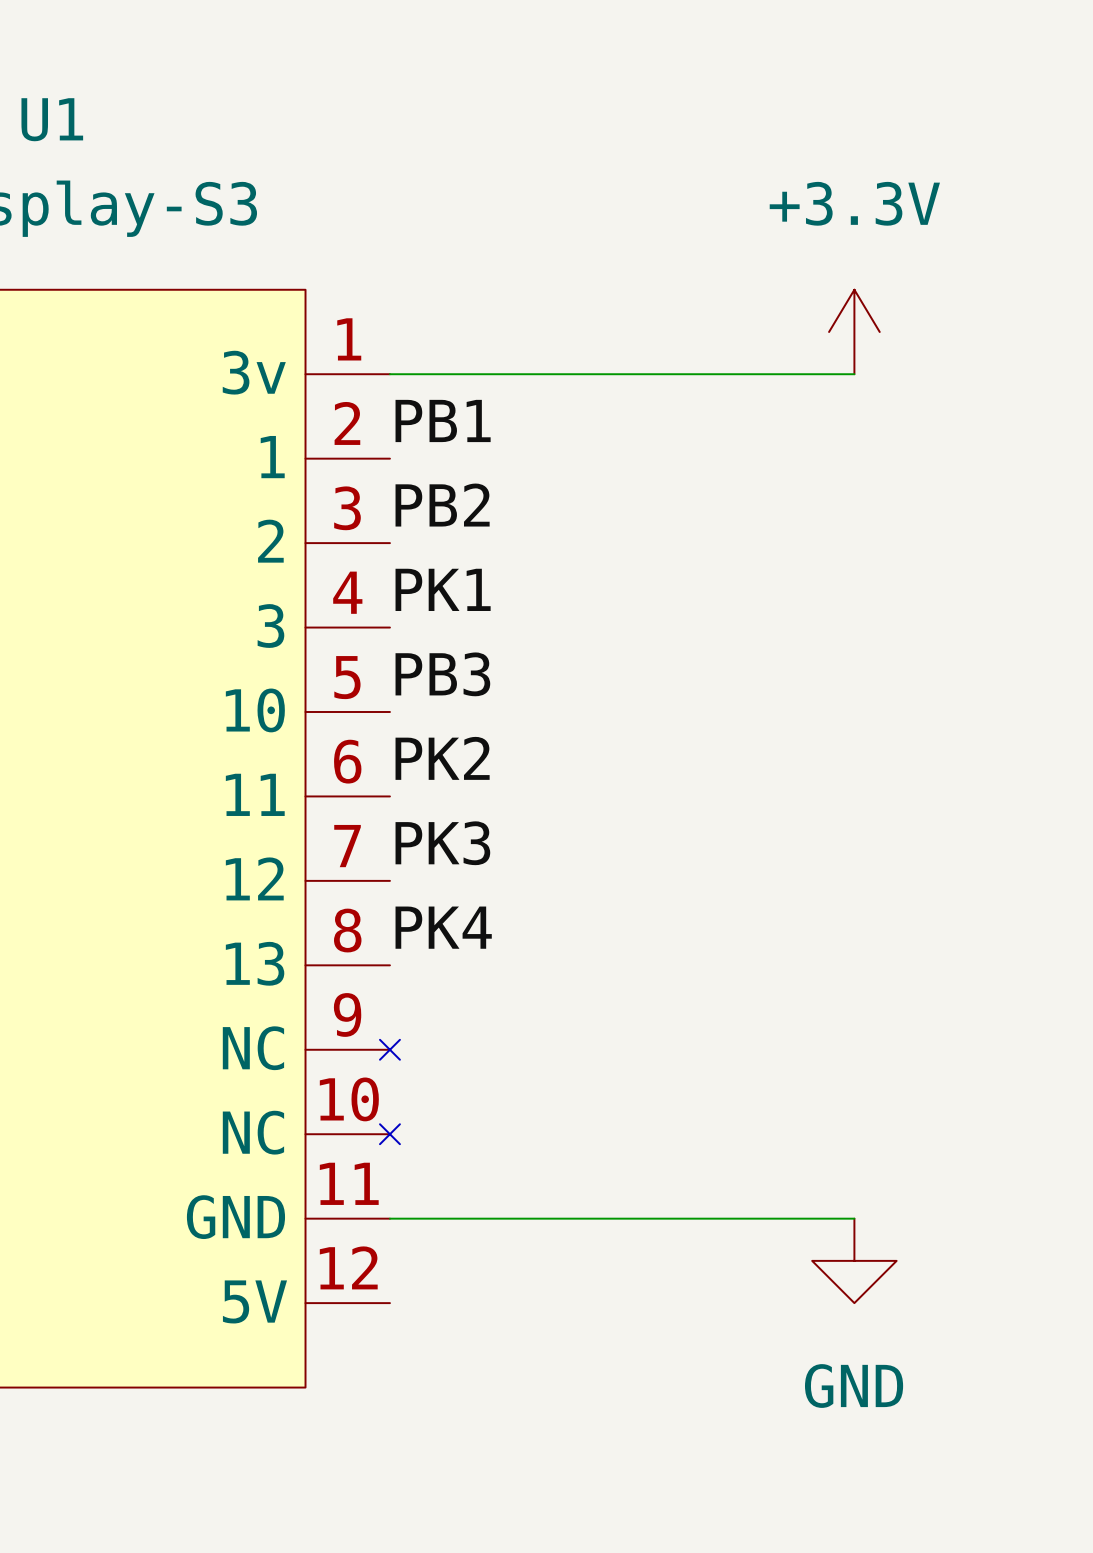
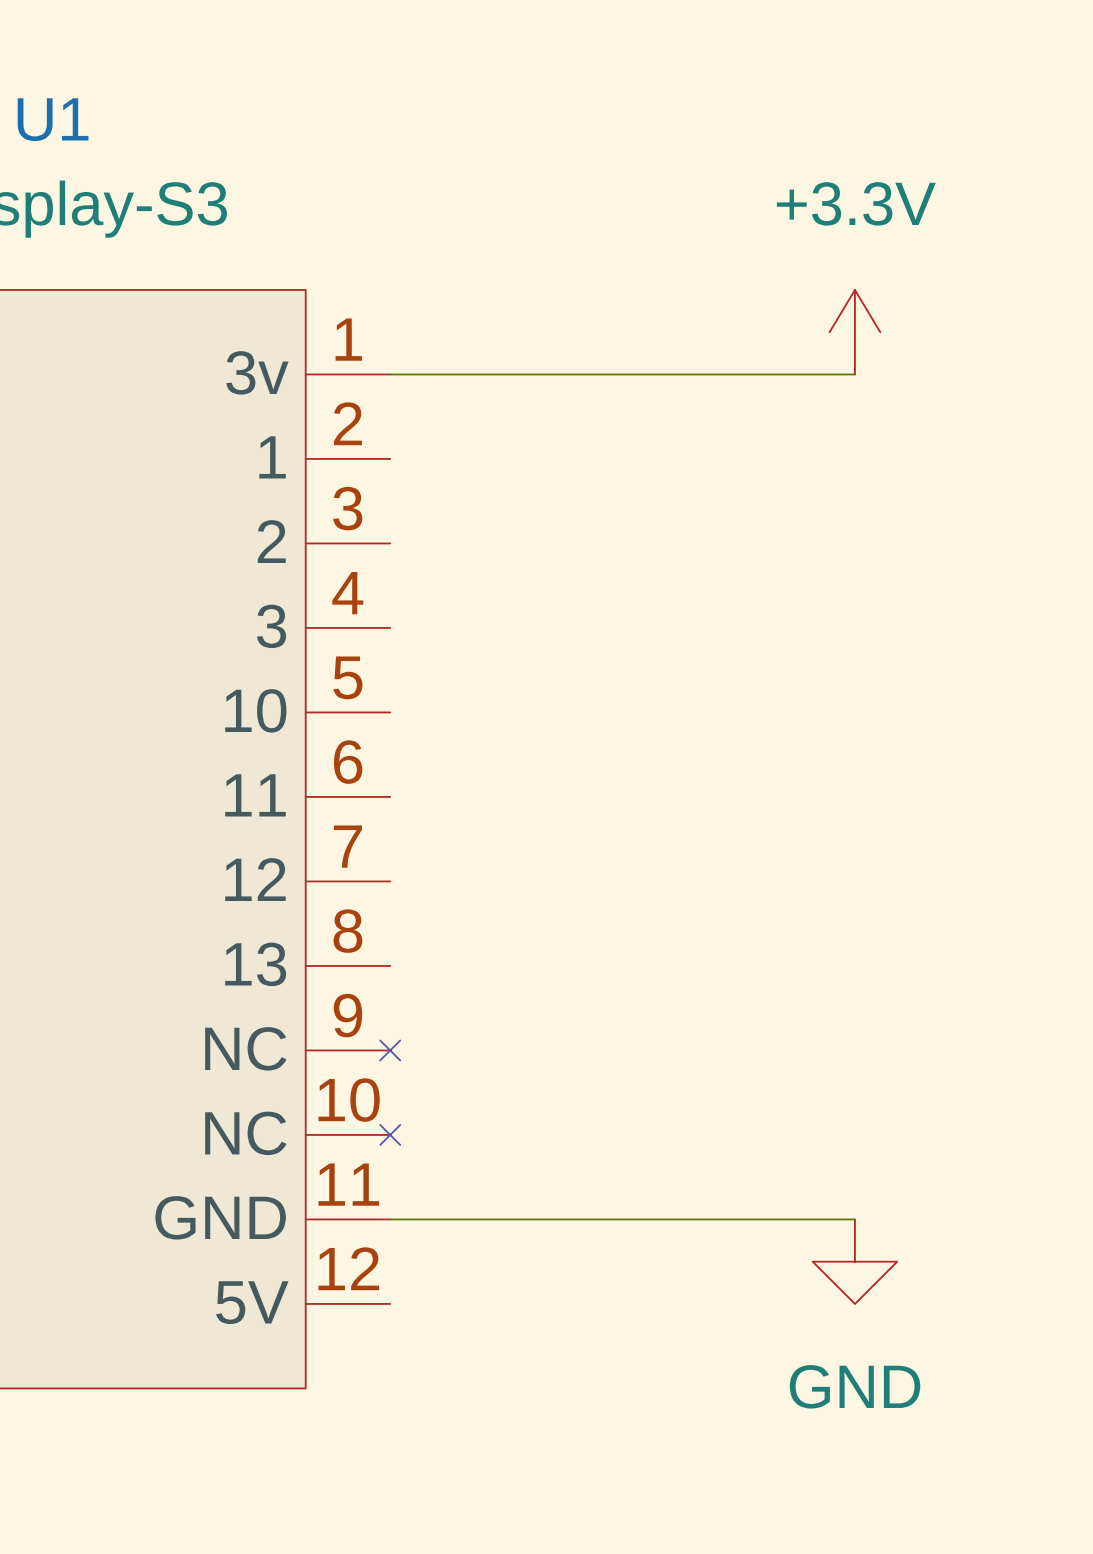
label: PB1 (443, 420) -> none
label: PB2 (442, 505) -> none
label: PK1 (443, 589) -> none
label: PB3 (442, 674) -> none
label: PK2 (442, 758) -> none
label: PK3 (442, 843) -> none
label: PK4 (443, 927) -> none

